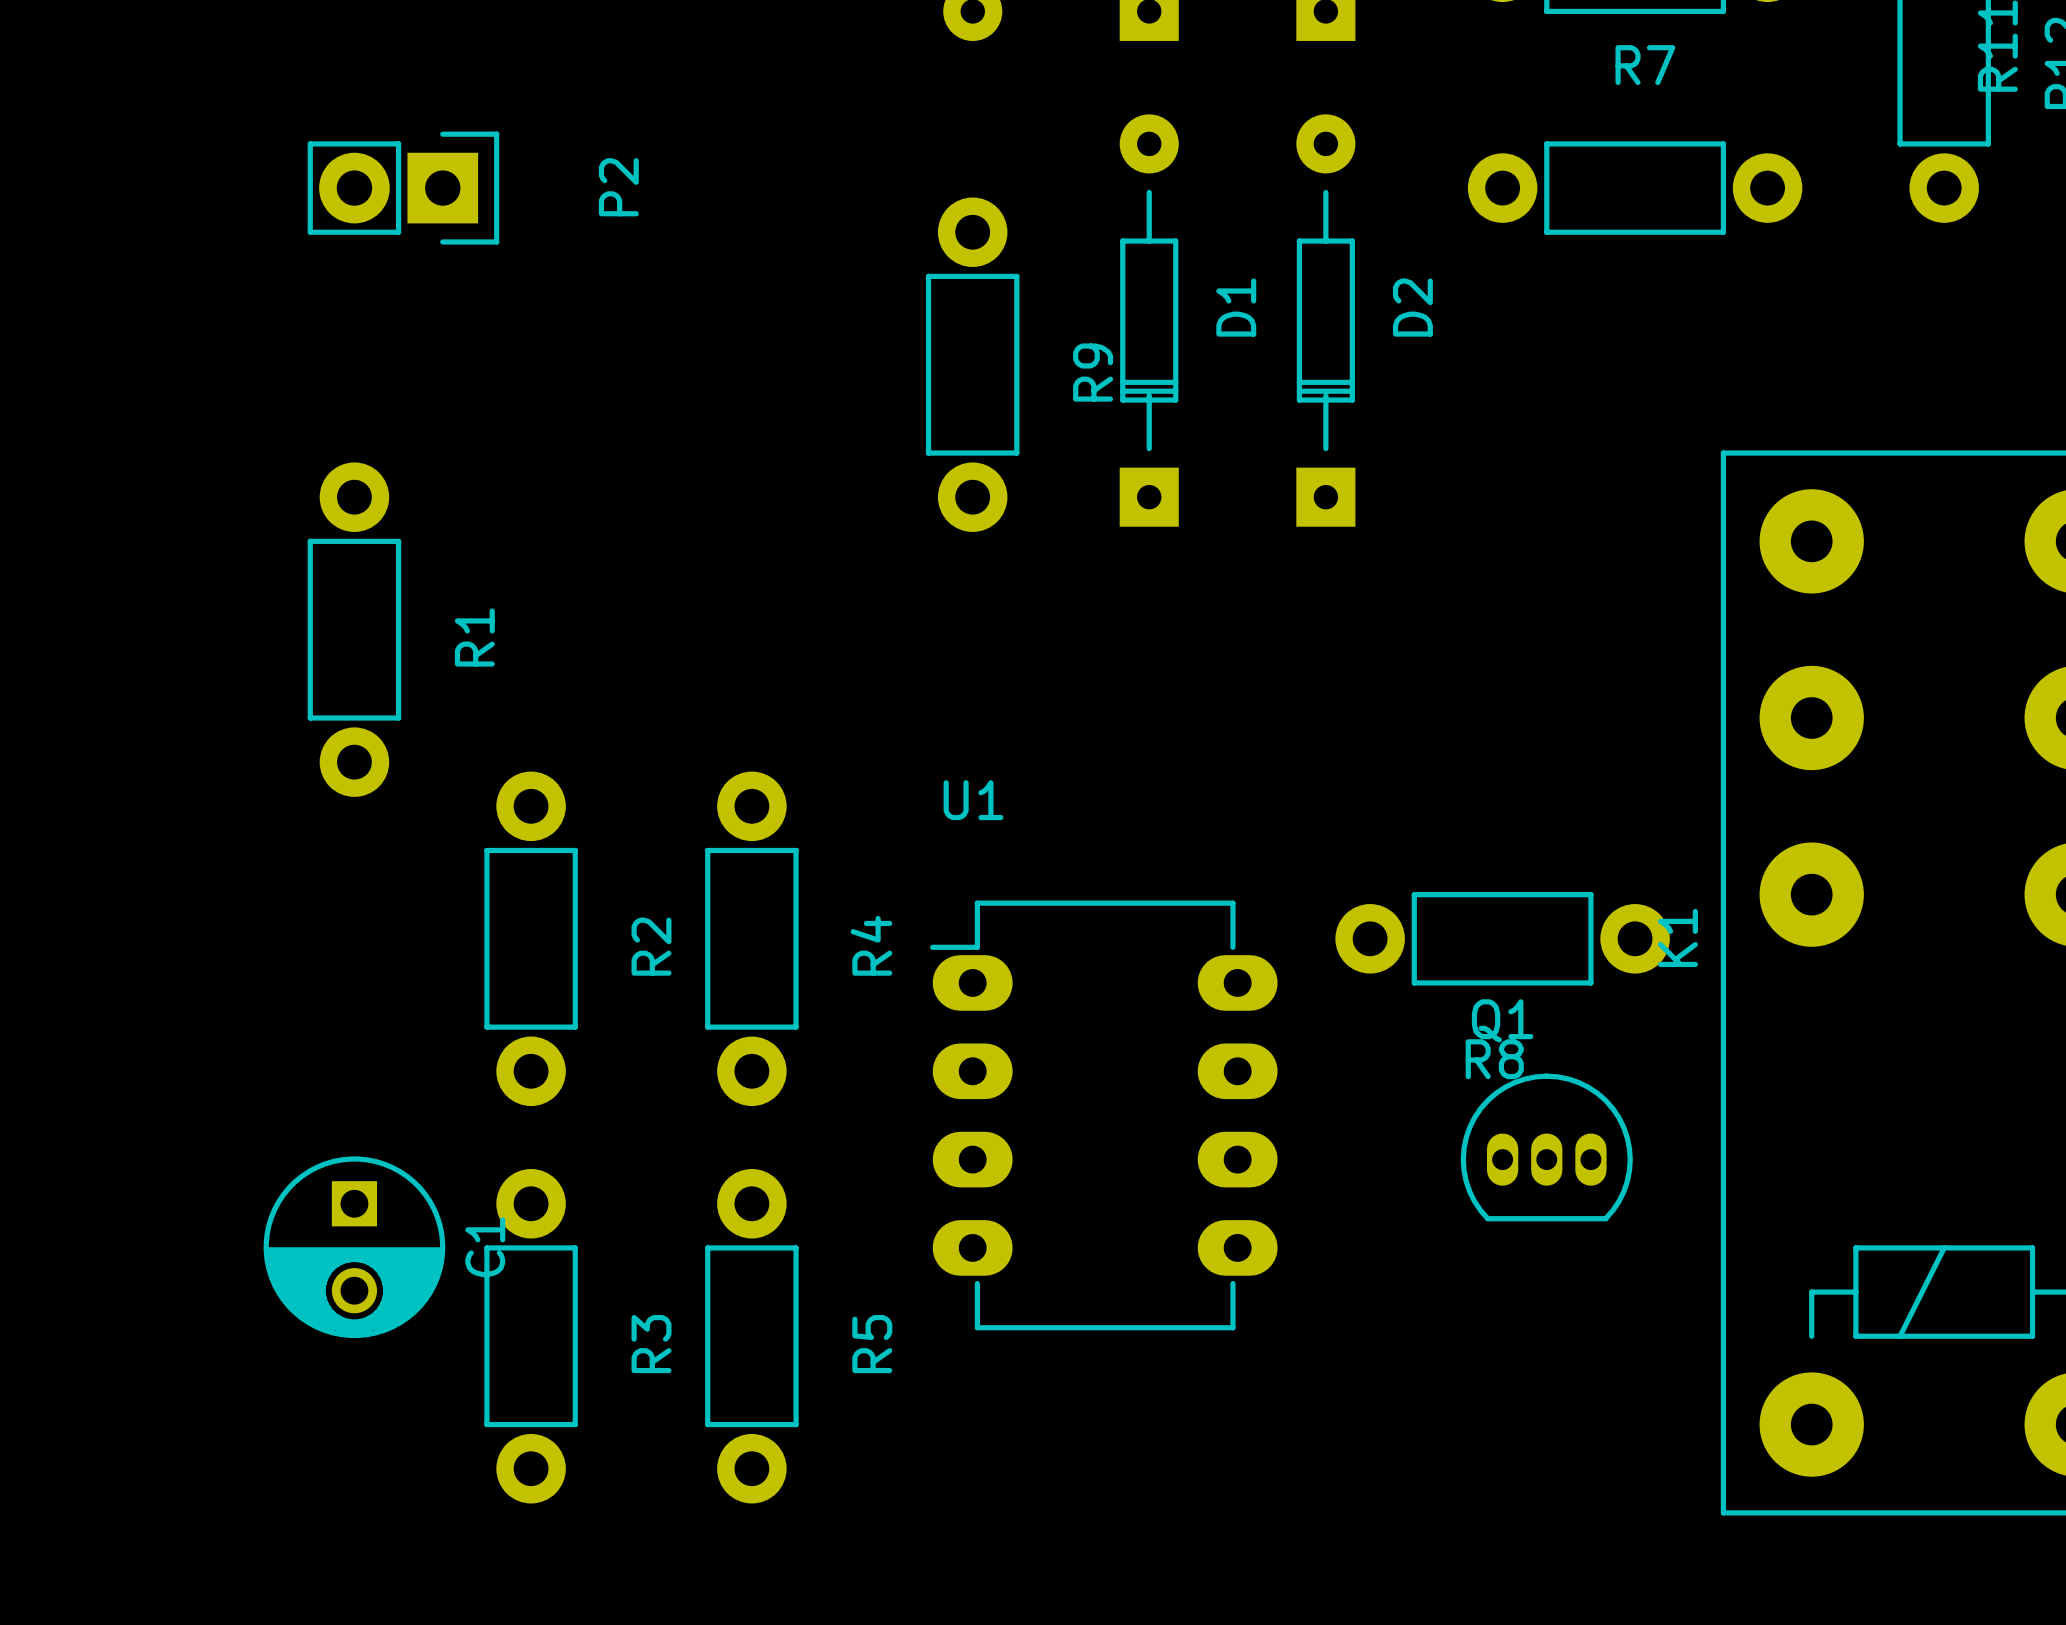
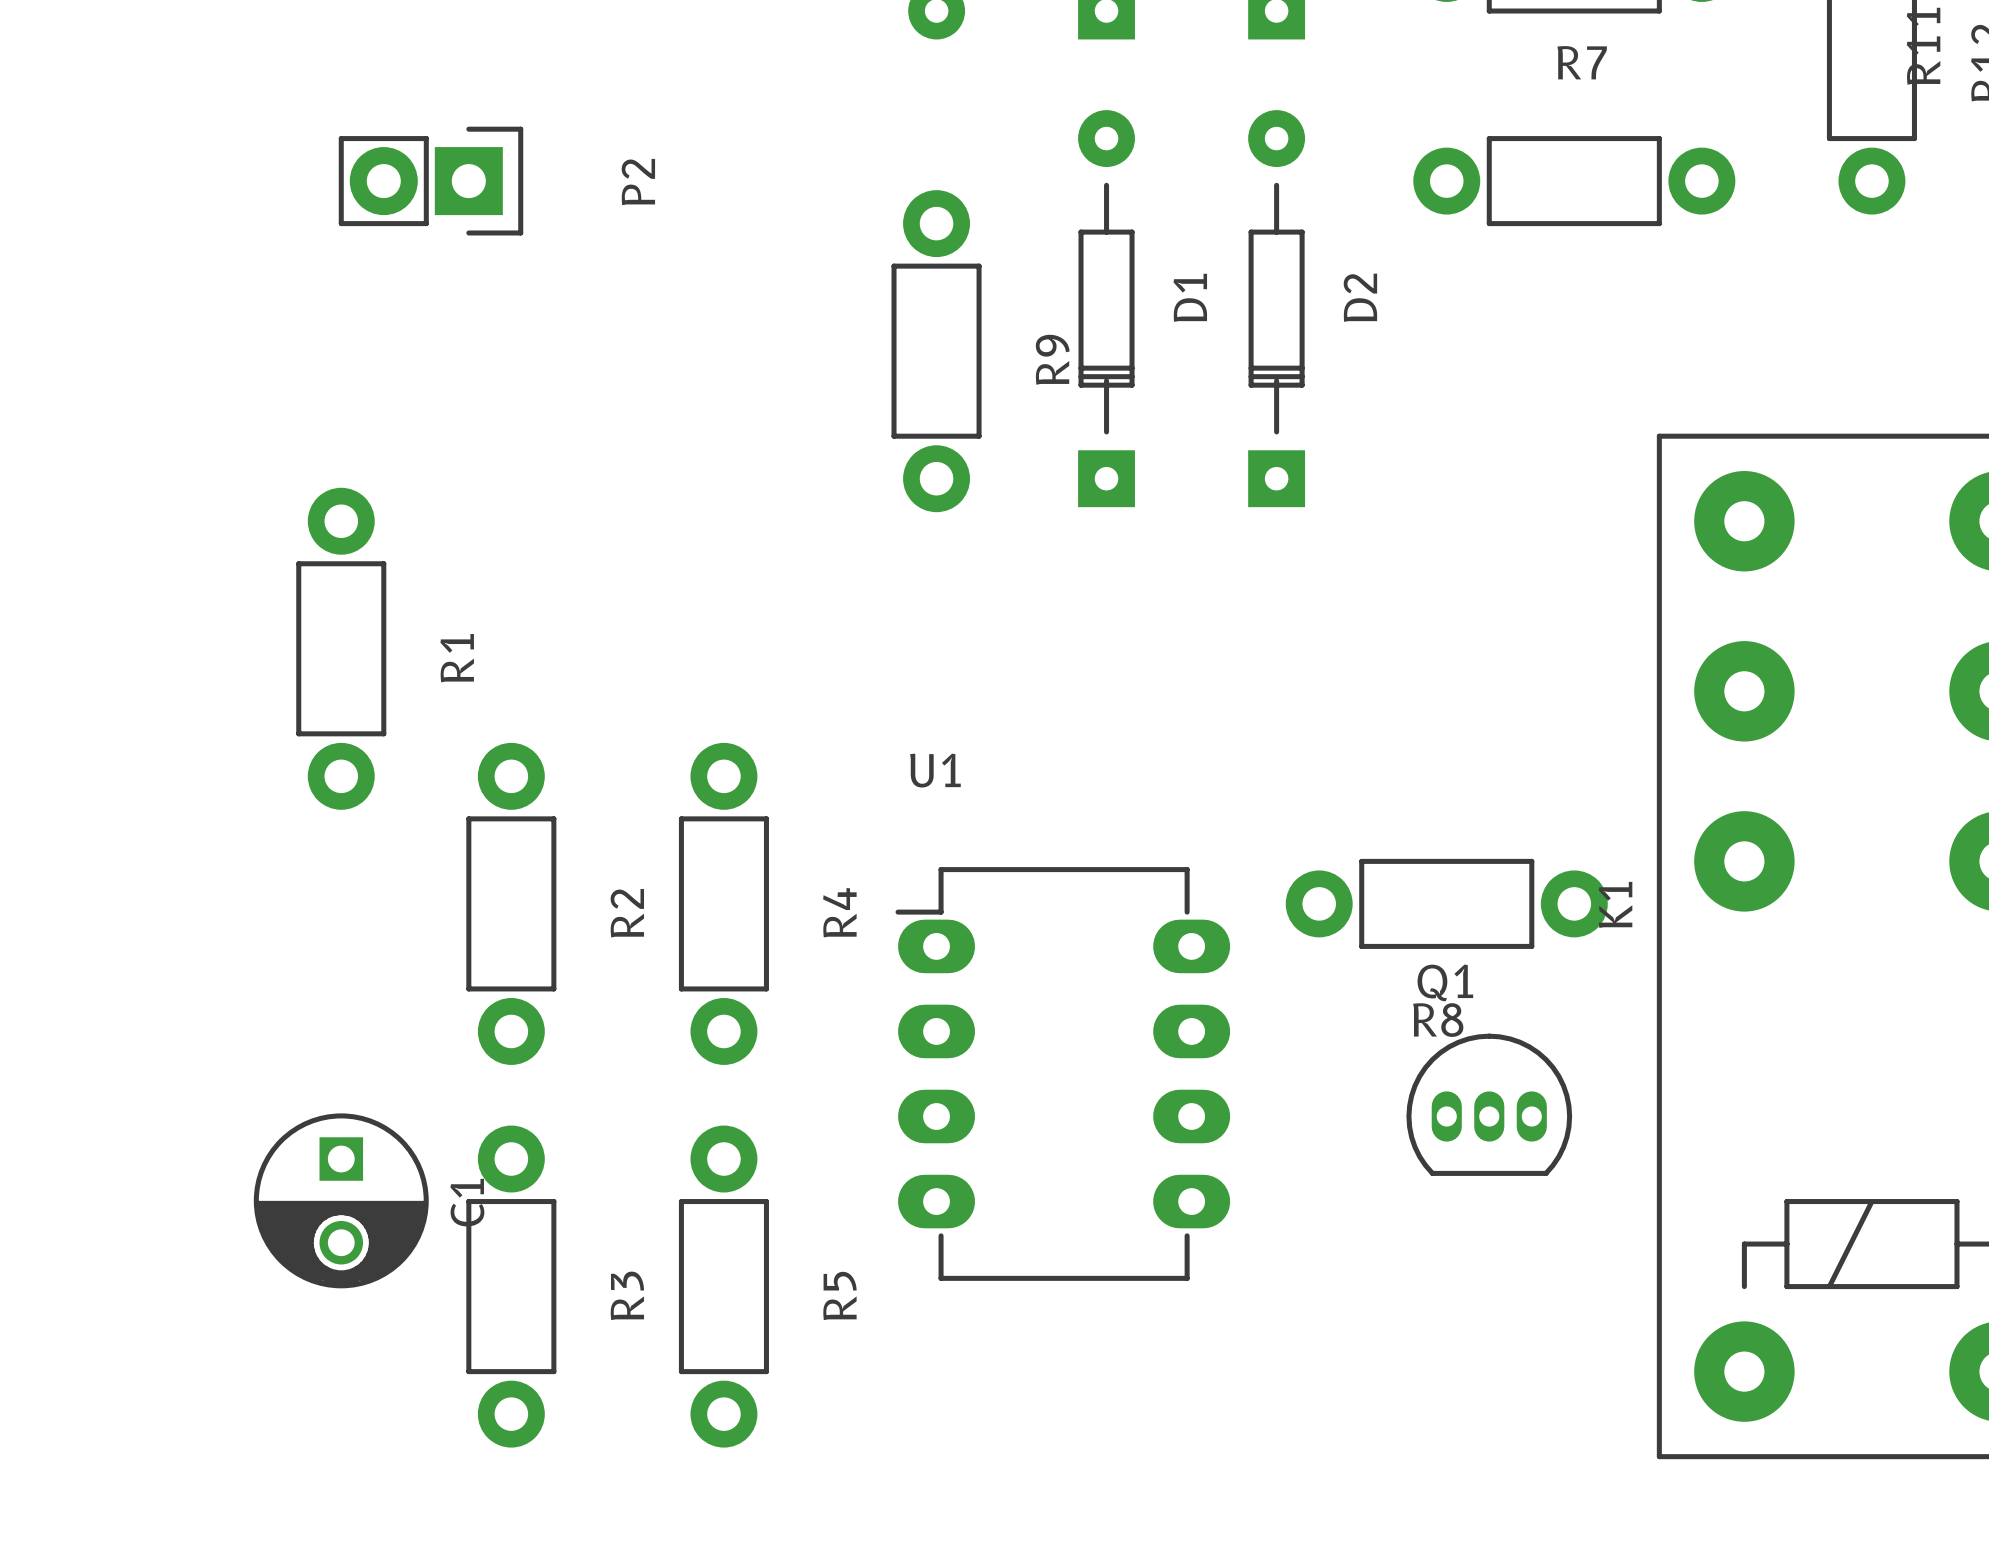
P2 position: (403, 188) -> (431, 181)
R1 position: (354, 629) -> (341, 648)

